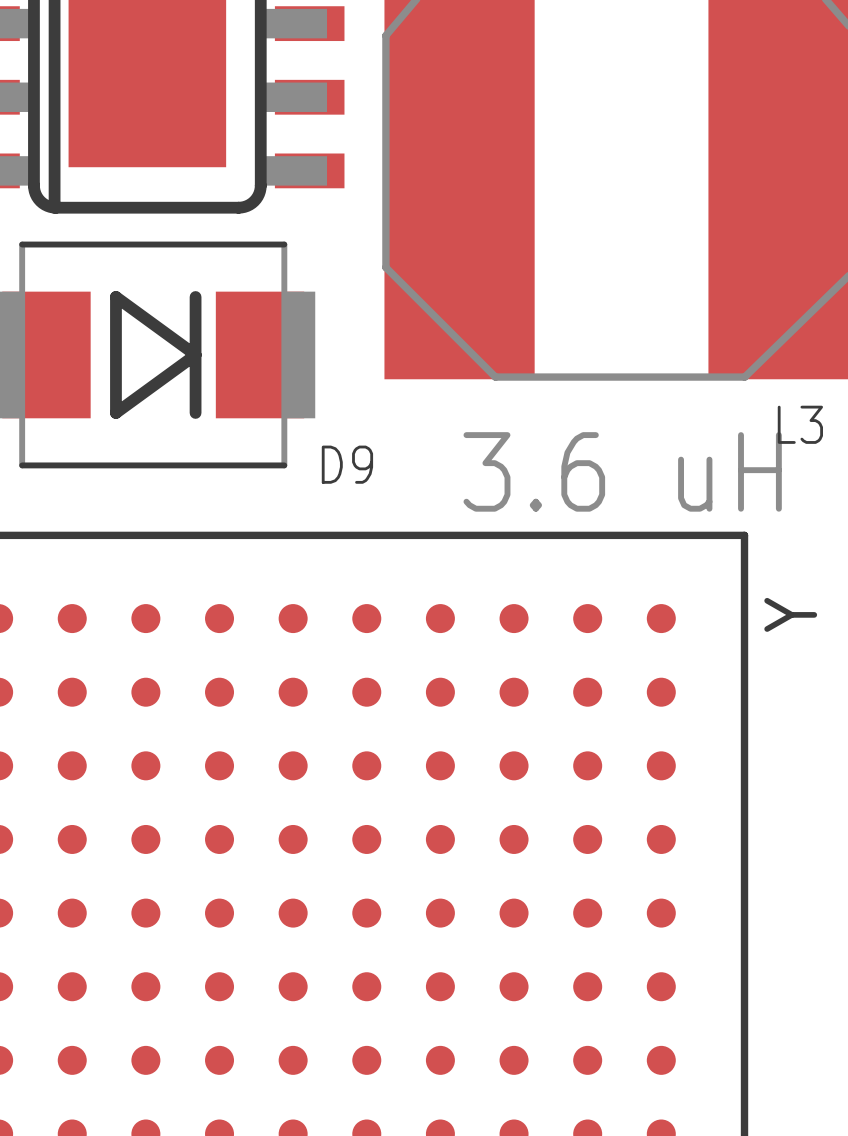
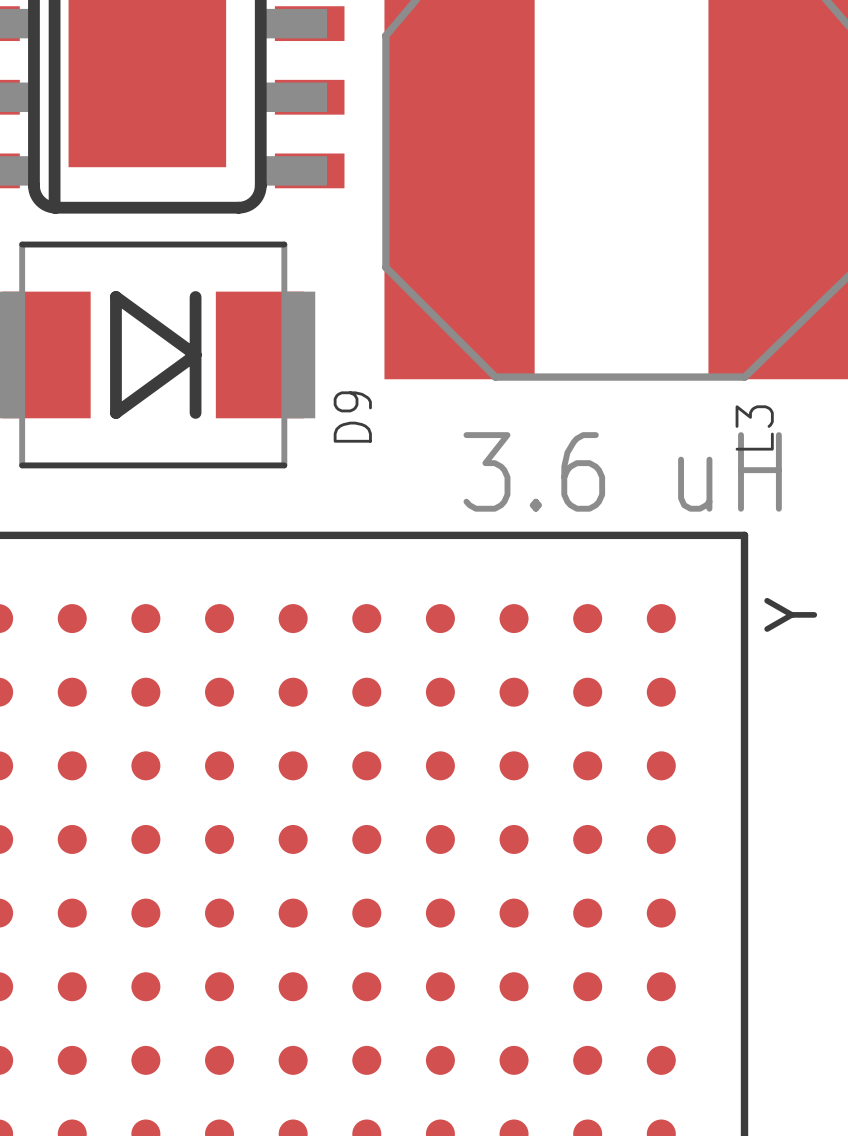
L3 name rotation: 0° (800, 424) -> 90° counterclockwise (754, 427)
D9 name rotation: 0° (347, 464) -> 90° counterclockwise (352, 417)

